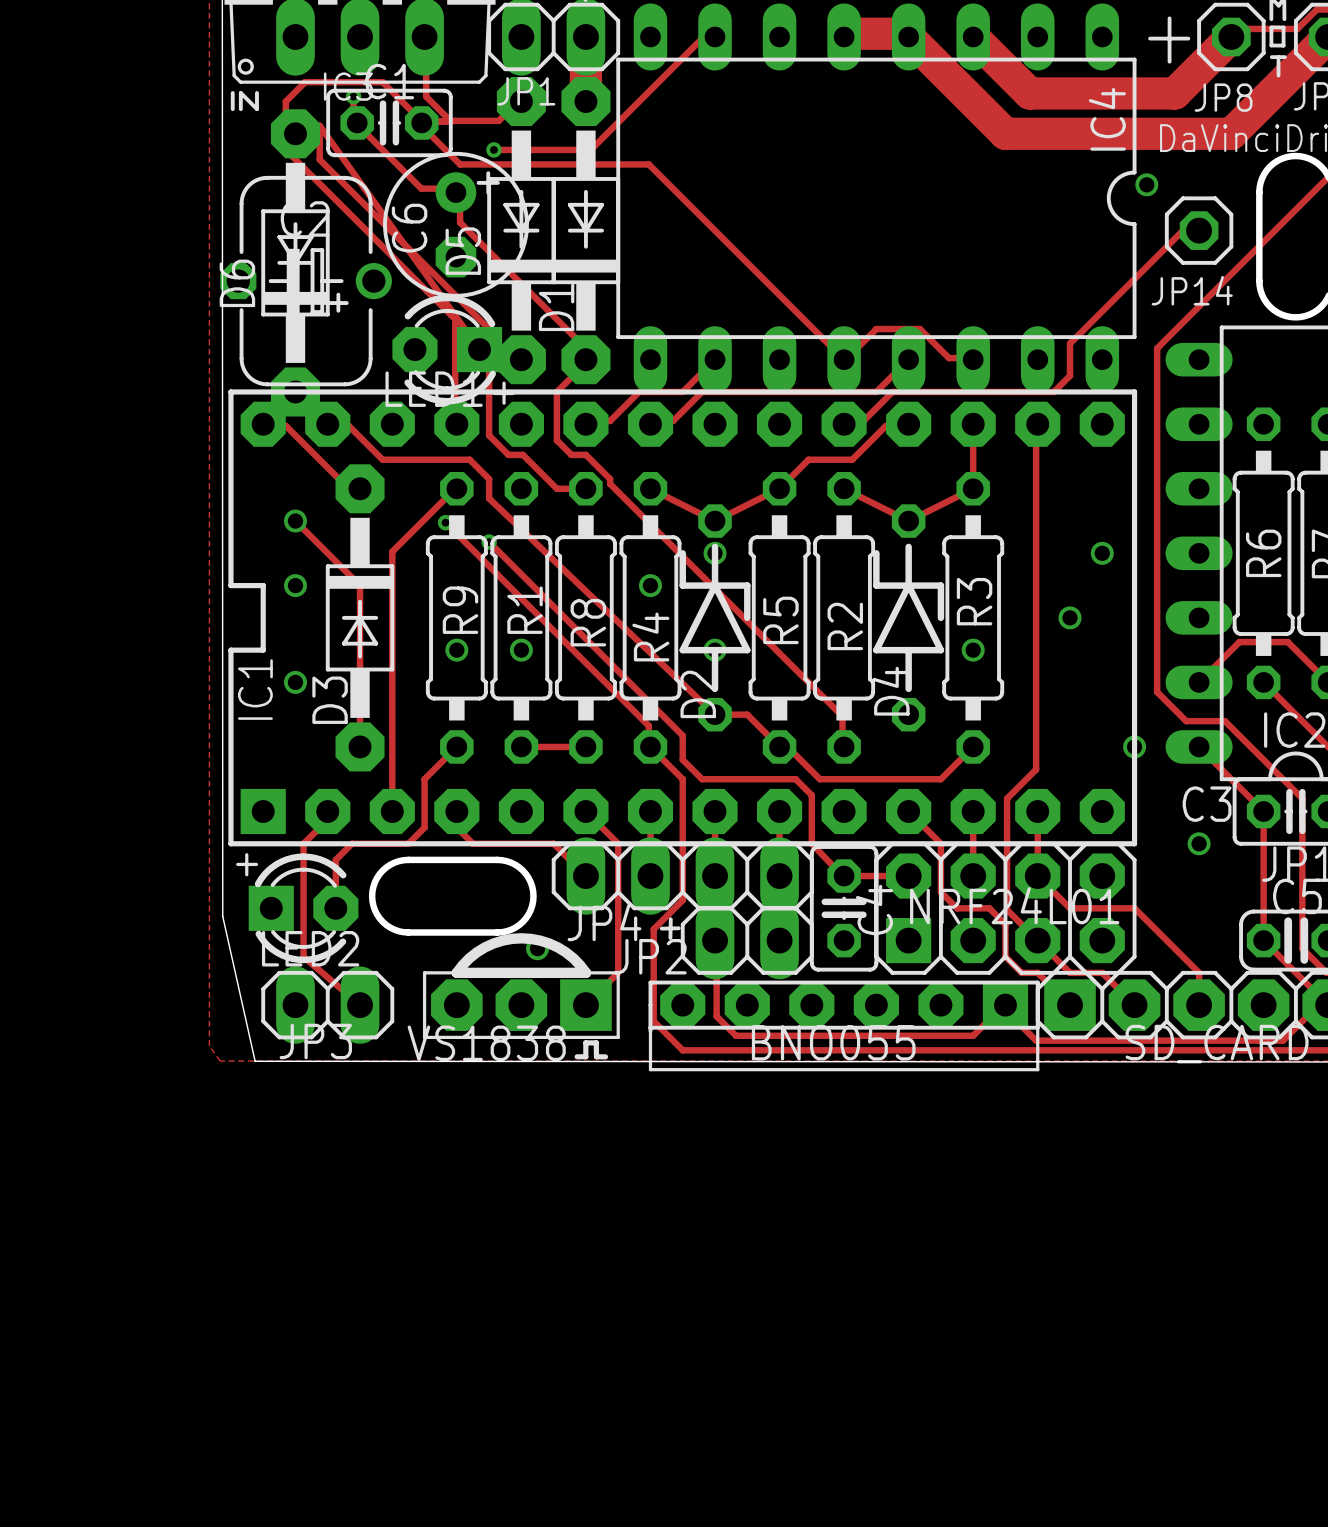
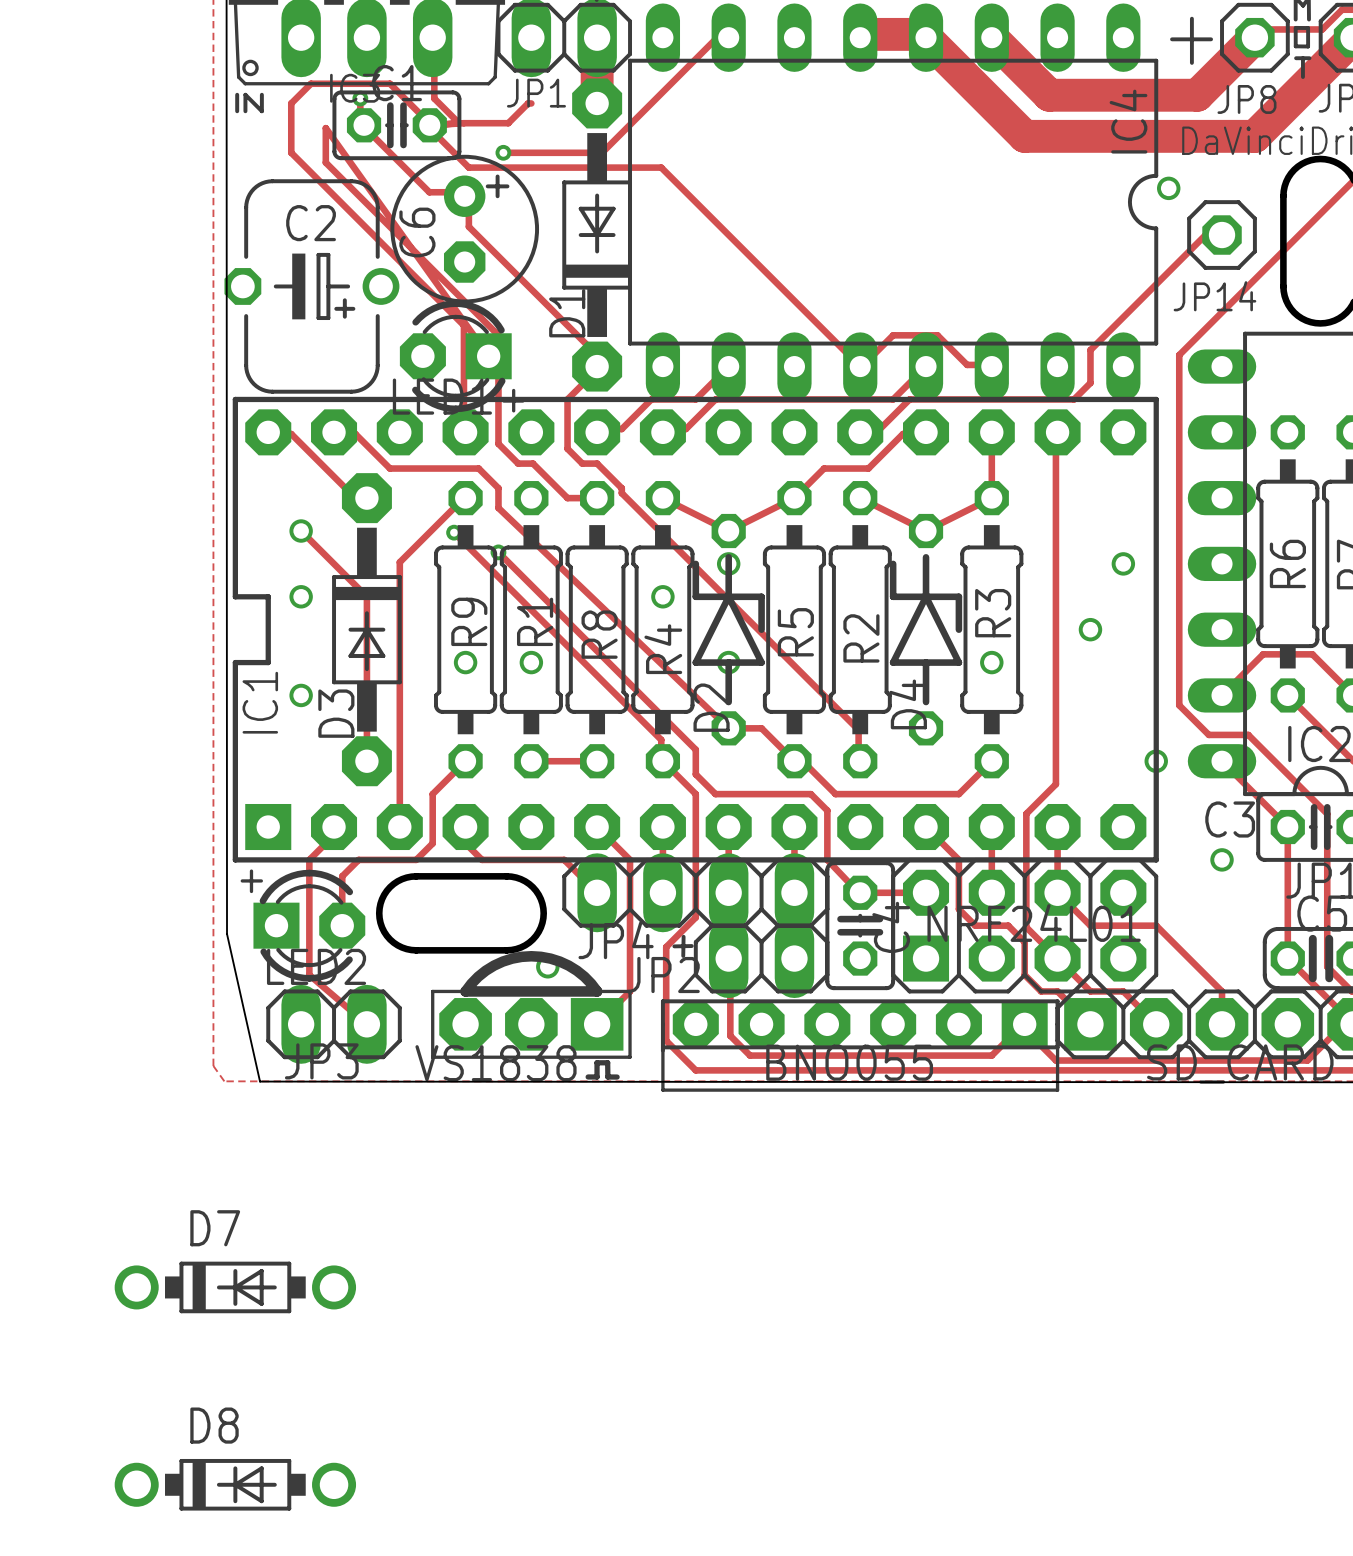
D5: (521, 230) -> none
D6: (295, 262) -> none
D7: none -> (235, 1287)
D8: none -> (235, 1484)

